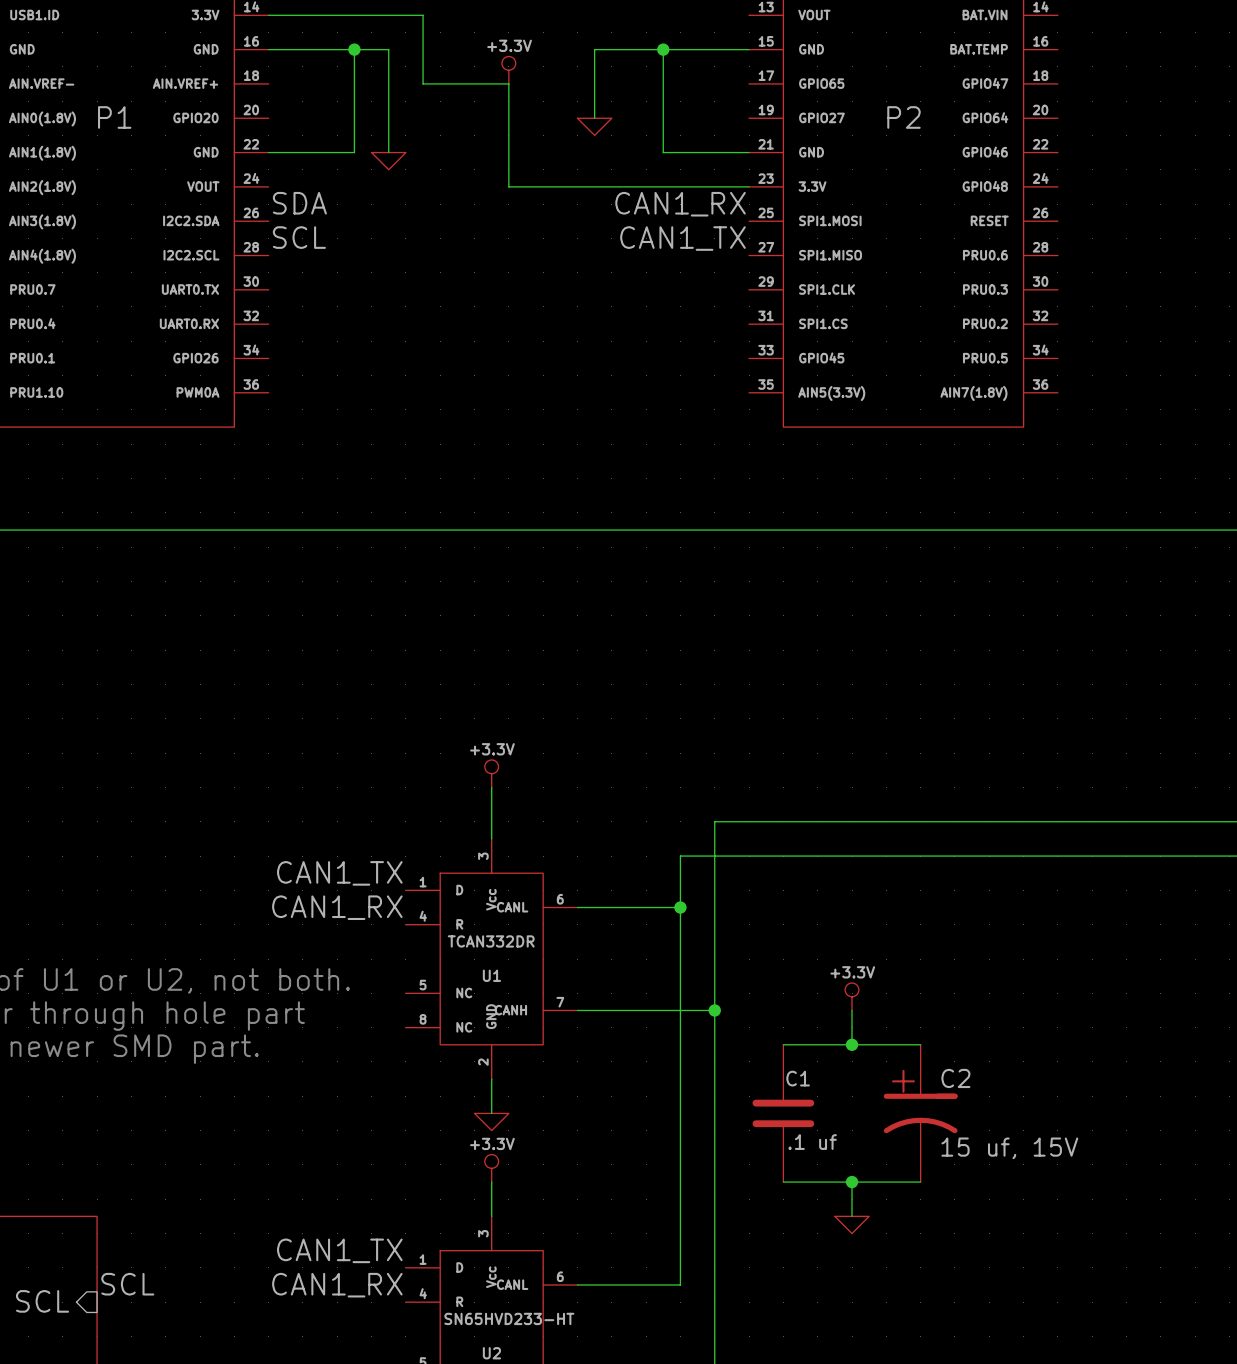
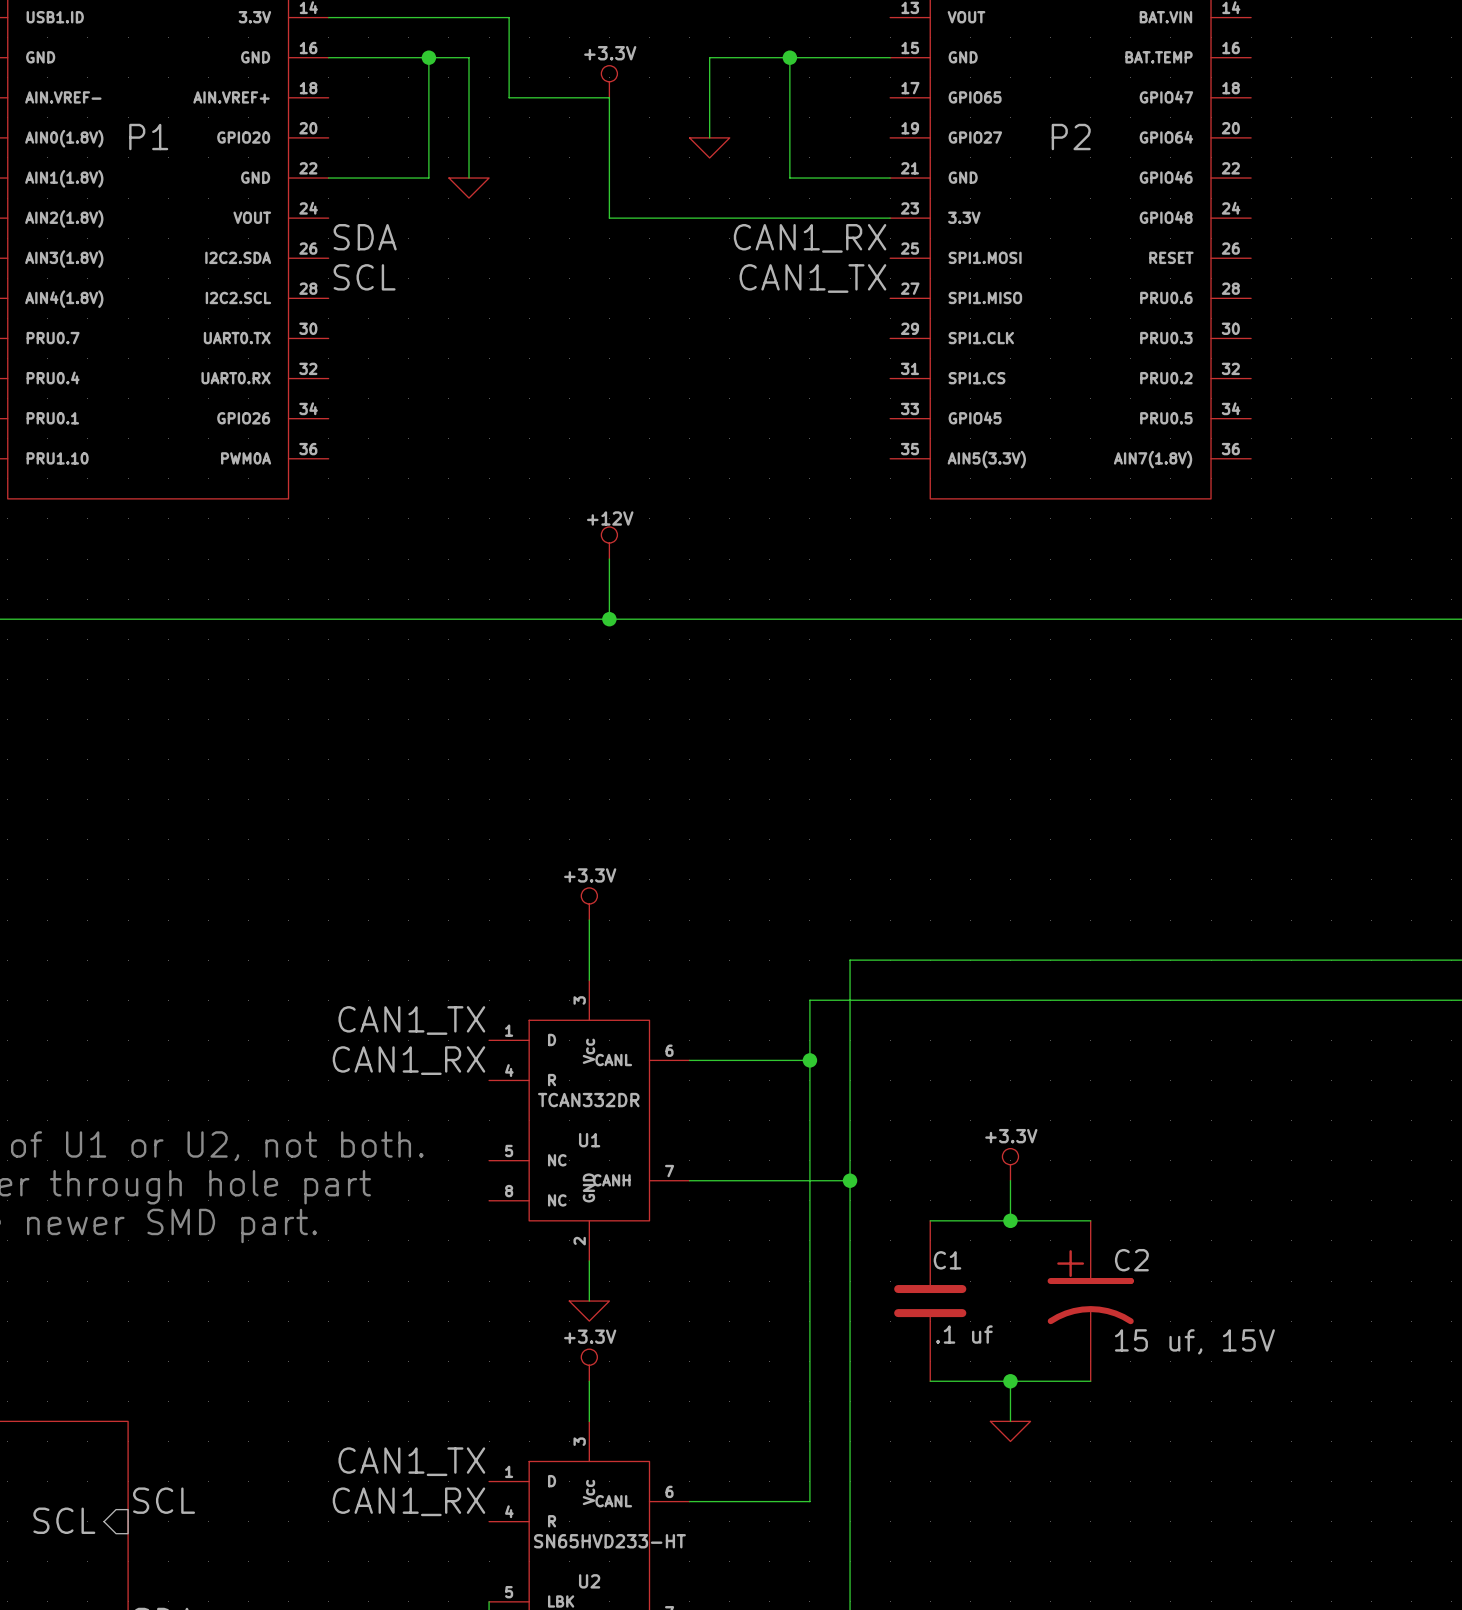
power symbol: none -> +12V (609, 543)
wire: none -> (609, 559) (609, 619)
junction: none -> (609, 619)

